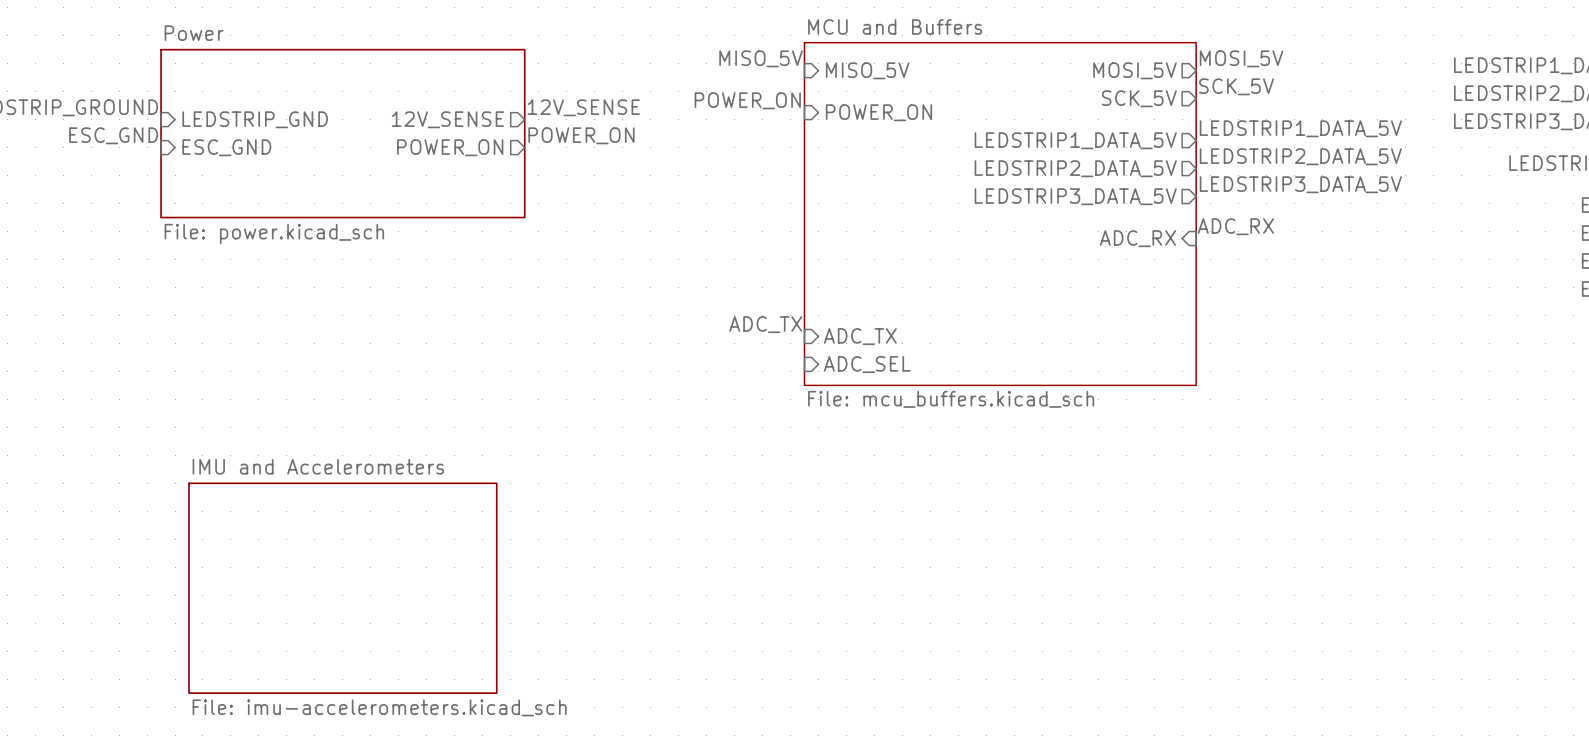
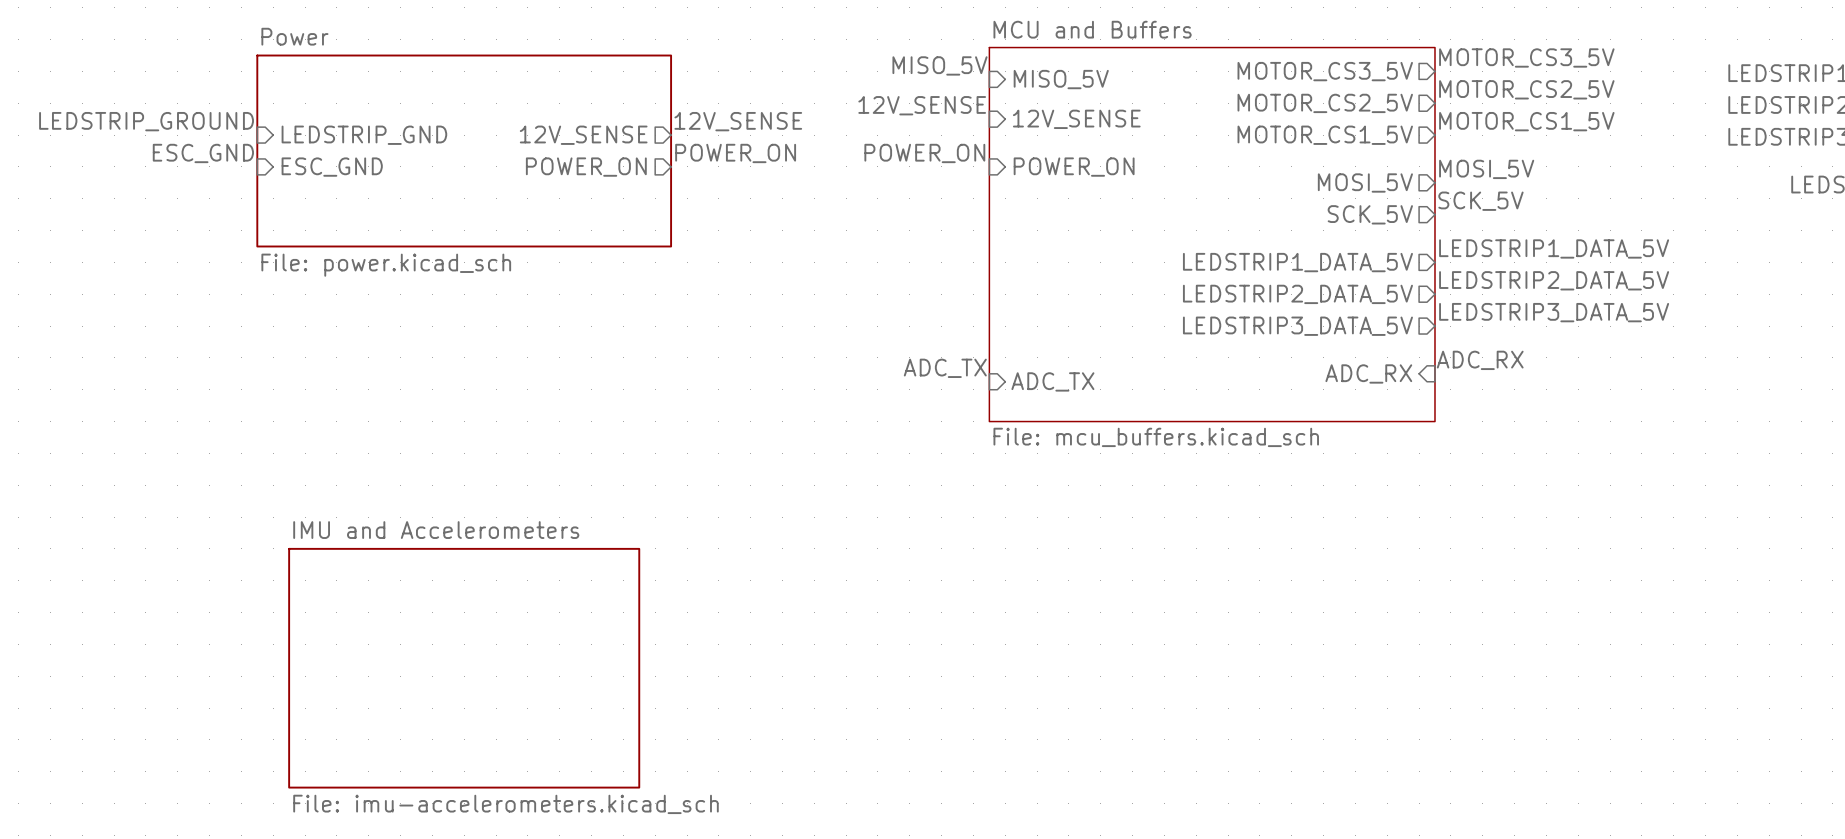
sheet MCU and Buffers shape: [804, 42, 1197, 386] -> [989, 47, 1435, 422]
label: none -> MOTOR_CS3_5V (1526, 57)
label position: MOSI_5V (1241, 58) -> MOSI_5V (1486, 169)
sheet pin: none -> MOTOR_CS3_5V (1325, 71)
sheet pin position: MOSI_5V (1134, 70) -> MOSI_5V (1365, 182)
label: none -> MOTOR_CS2_5V (1526, 89)
label position: SCK_5V (1236, 86) -> SCK_5V (1480, 201)
sheet pin: none -> MOTOR_CS2_5V (1325, 103)
label: none -> 12V_SENSE (922, 105)
sheet pin position: SCK_5V (1139, 98) -> SCK_5V (1370, 214)
label position: POWER_ON (747, 100) -> POWER_ON (924, 153)
sheet pin: none -> 12V_SENSE (1076, 119)
label: none -> MOTOR_CS1_5V (1526, 121)
sheet pin position: POWER_ON (878, 112) -> POWER_ON (1074, 167)
sheet pin: none -> MOTOR_CS1_5V (1325, 135)
label position: LEDSTRIP1_DATA_5V (1300, 128) -> LEDSTRIP1_DATA_5V (1554, 248)
sheet pin position: LEDSTRIP1_DATA_5V (1075, 140) -> LEDSTRIP1_DATA_5V (1297, 262)
label position: LEDSTRIP2_DATA_5V (1300, 156) -> LEDSTRIP2_DATA_5V (1554, 280)
sheet pin position: LEDSTRIP2_DATA_5V (1075, 168) -> LEDSTRIP2_DATA_5V (1297, 294)
label position: LEDSTRIP3_DATA_5V (1300, 184) -> LEDSTRIP3_DATA_5V (1554, 312)
sheet pin position: LEDSTRIP3_DATA_5V (1075, 196) -> LEDSTRIP3_DATA_5V (1297, 326)
label position: ADC_RX (1235, 226) -> ADC_RX (1480, 360)
sheet pin position: ADC_RX (1137, 238) -> ADC_RX (1368, 373)
sheet pin: ADC_SEL (867, 364) -> none

